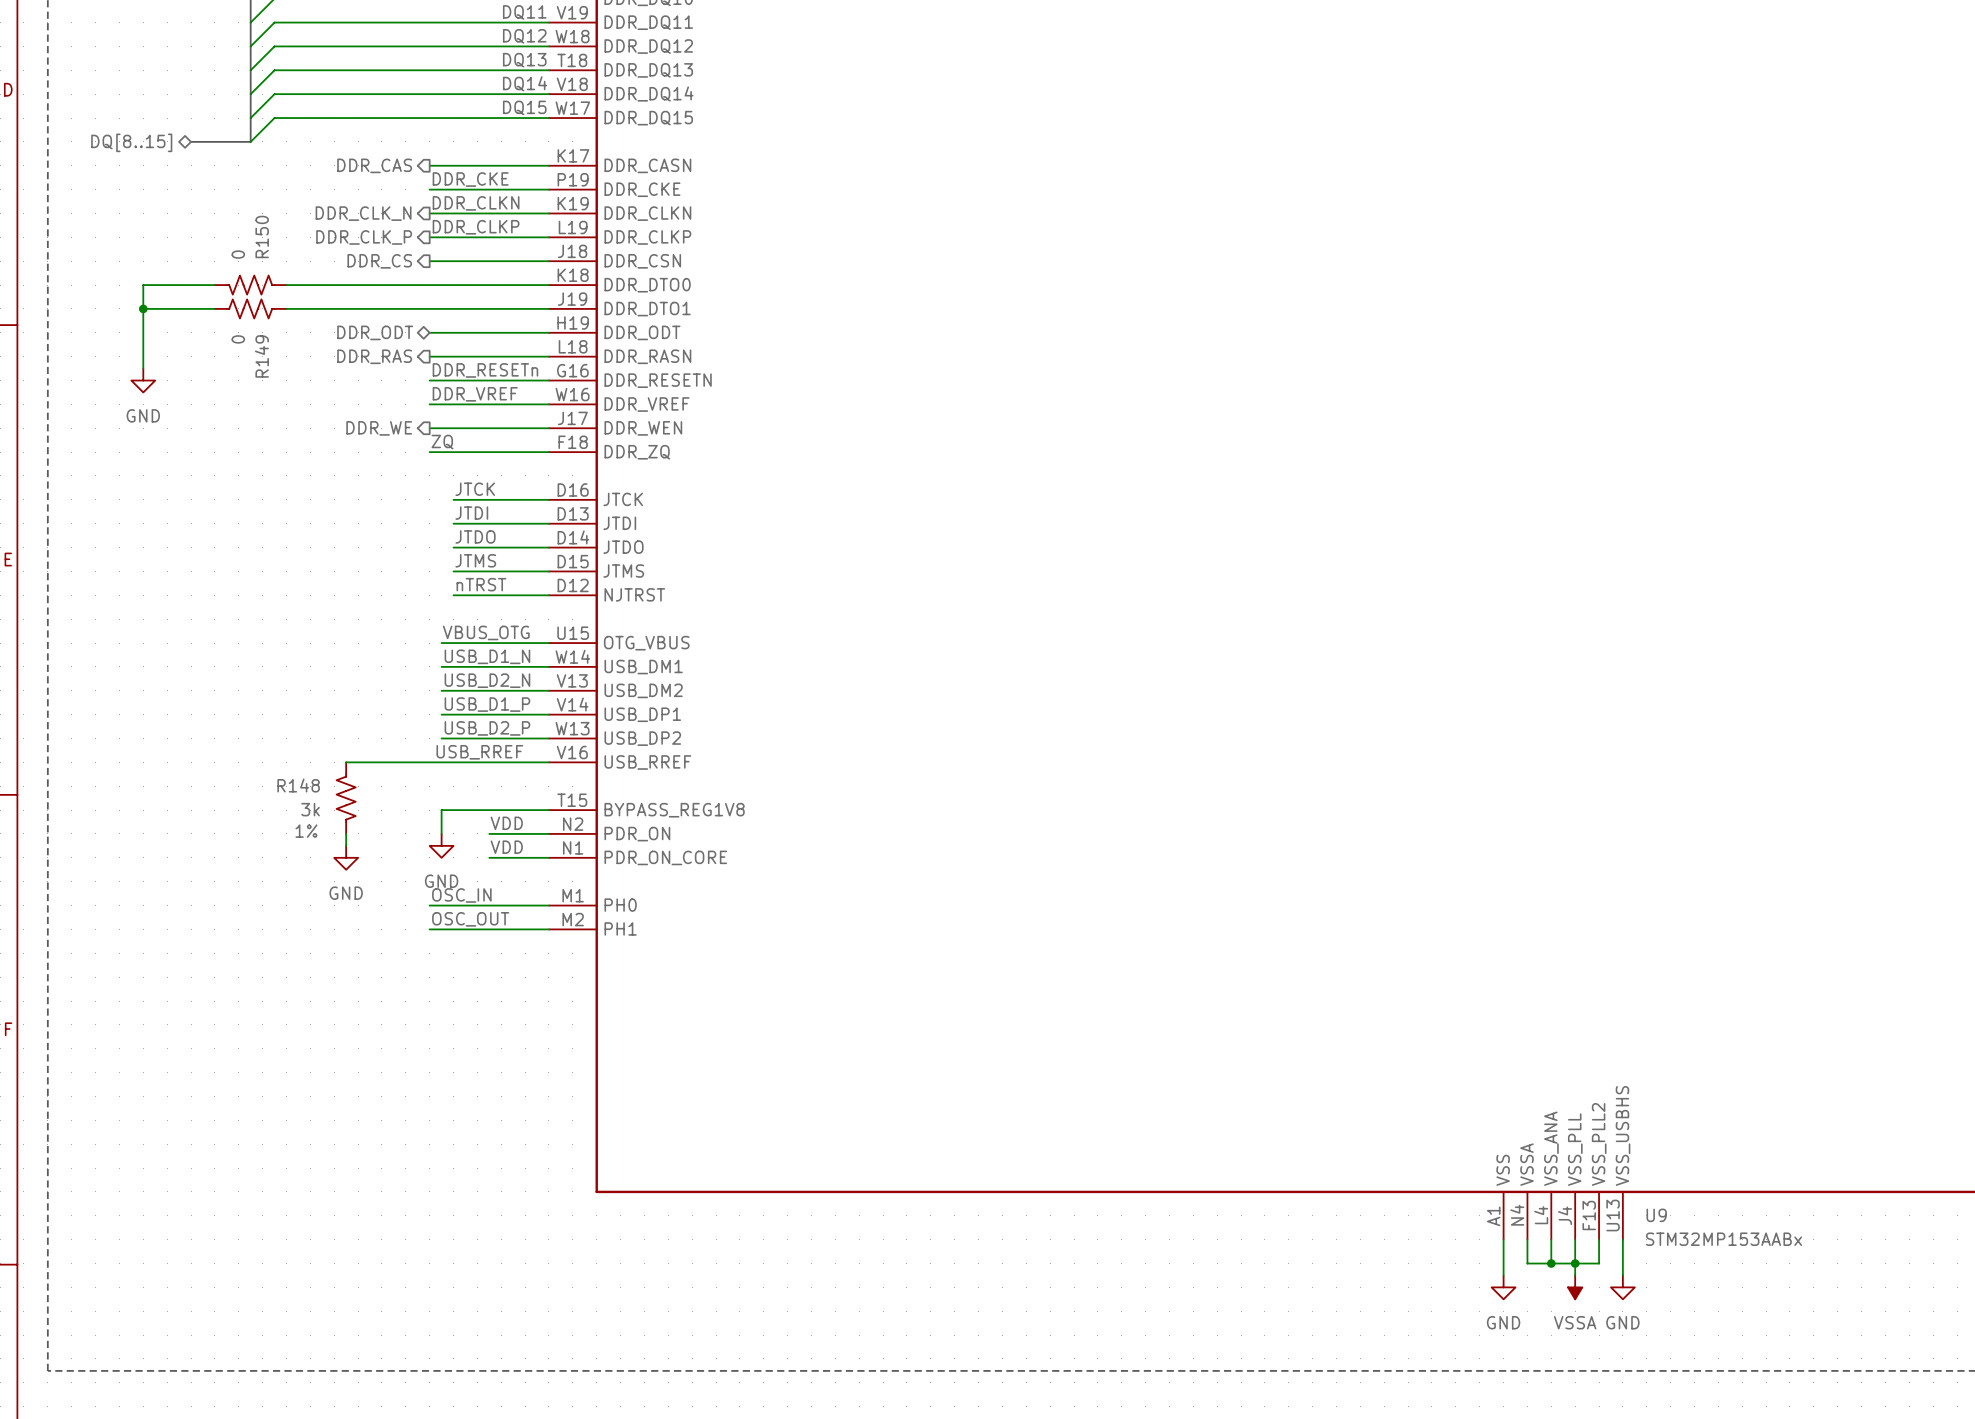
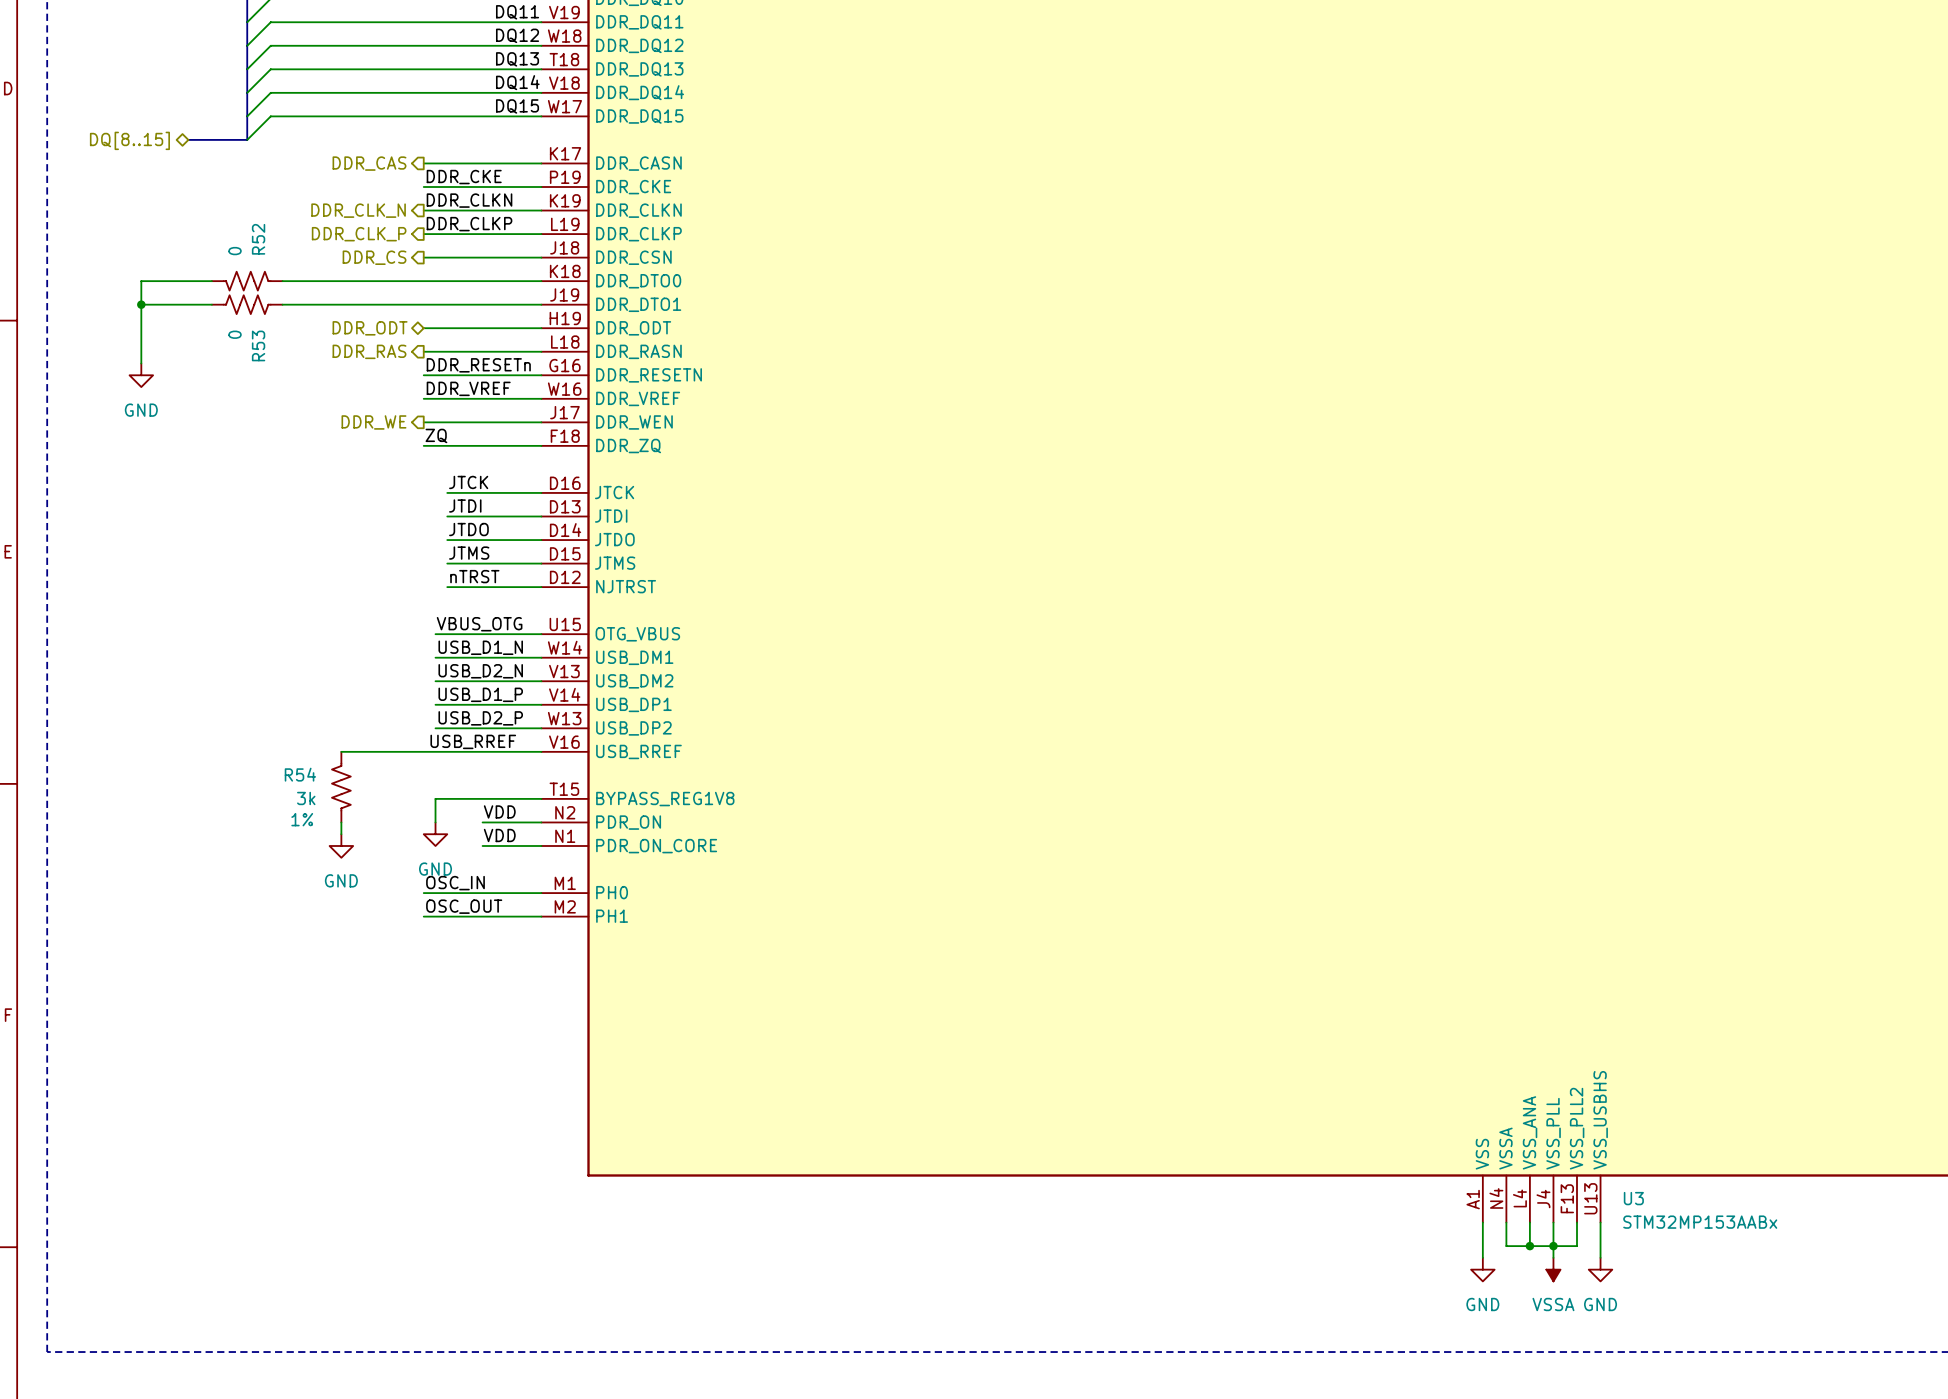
R150 name: R150 (262, 236) -> R52 (258, 239)
R149 name: R149 (261, 356) -> R53 (258, 345)
R148 name: R148 (298, 785) -> R54 (300, 774)
U9 name: U9 (1656, 1215) -> U3 (1633, 1198)

